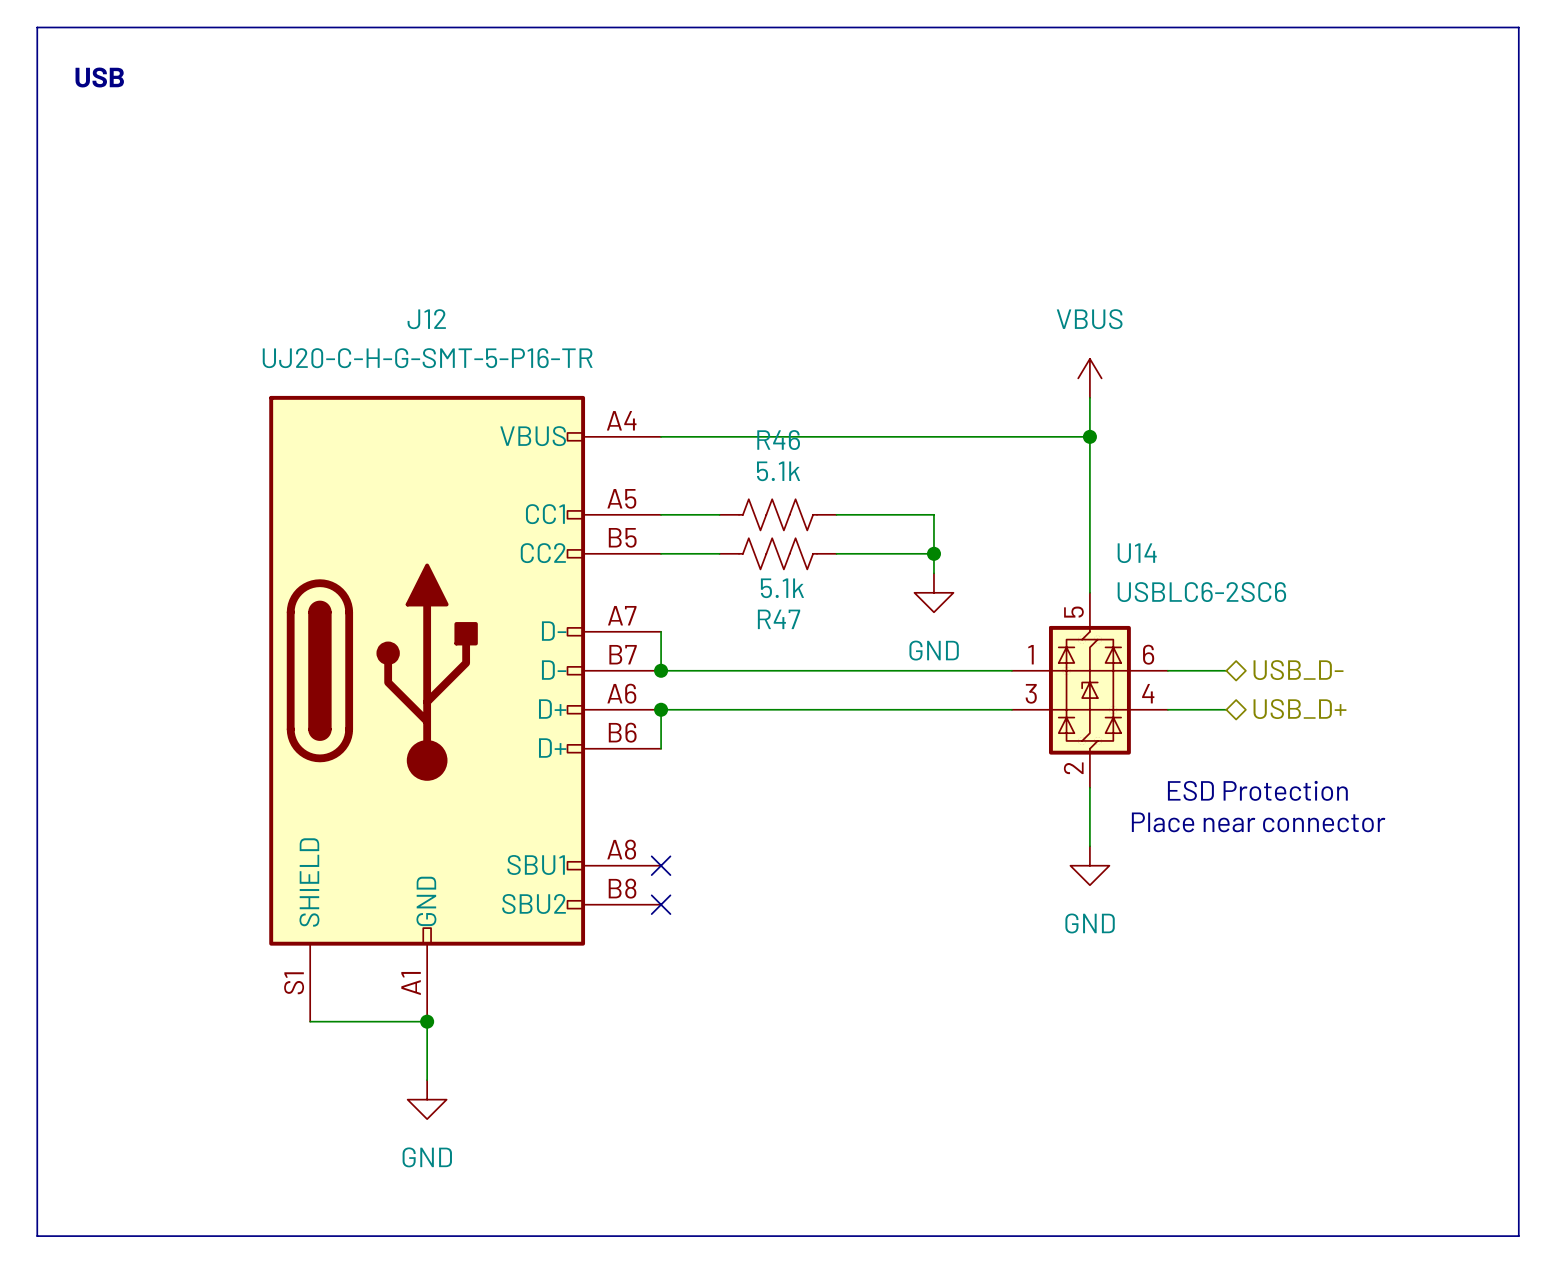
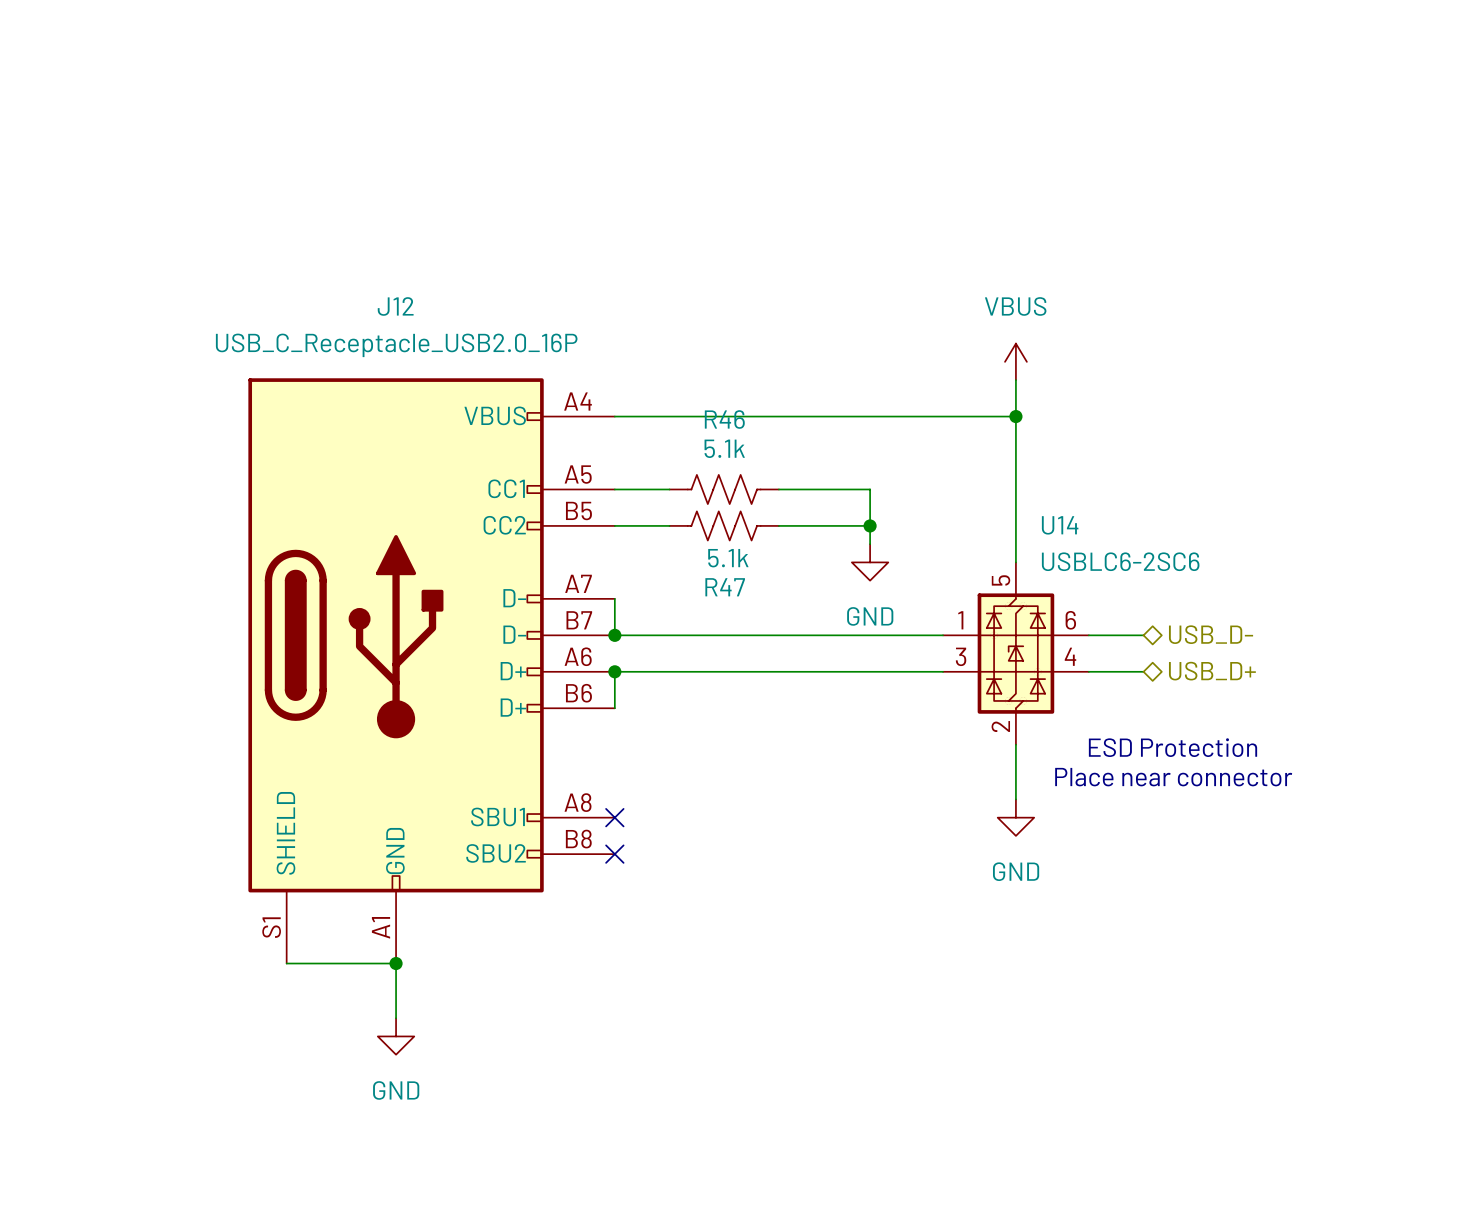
line: (37, 27) (1518, 27) (1518, 1236) (37, 1236) (37, 27) -> none
text: USB (99, 77) -> none
J12 value: UJ20-C-H-G-SMT-5-P16-TR (427, 358) -> USB_C_Receptacle_USB2.0_16P (396, 345)

